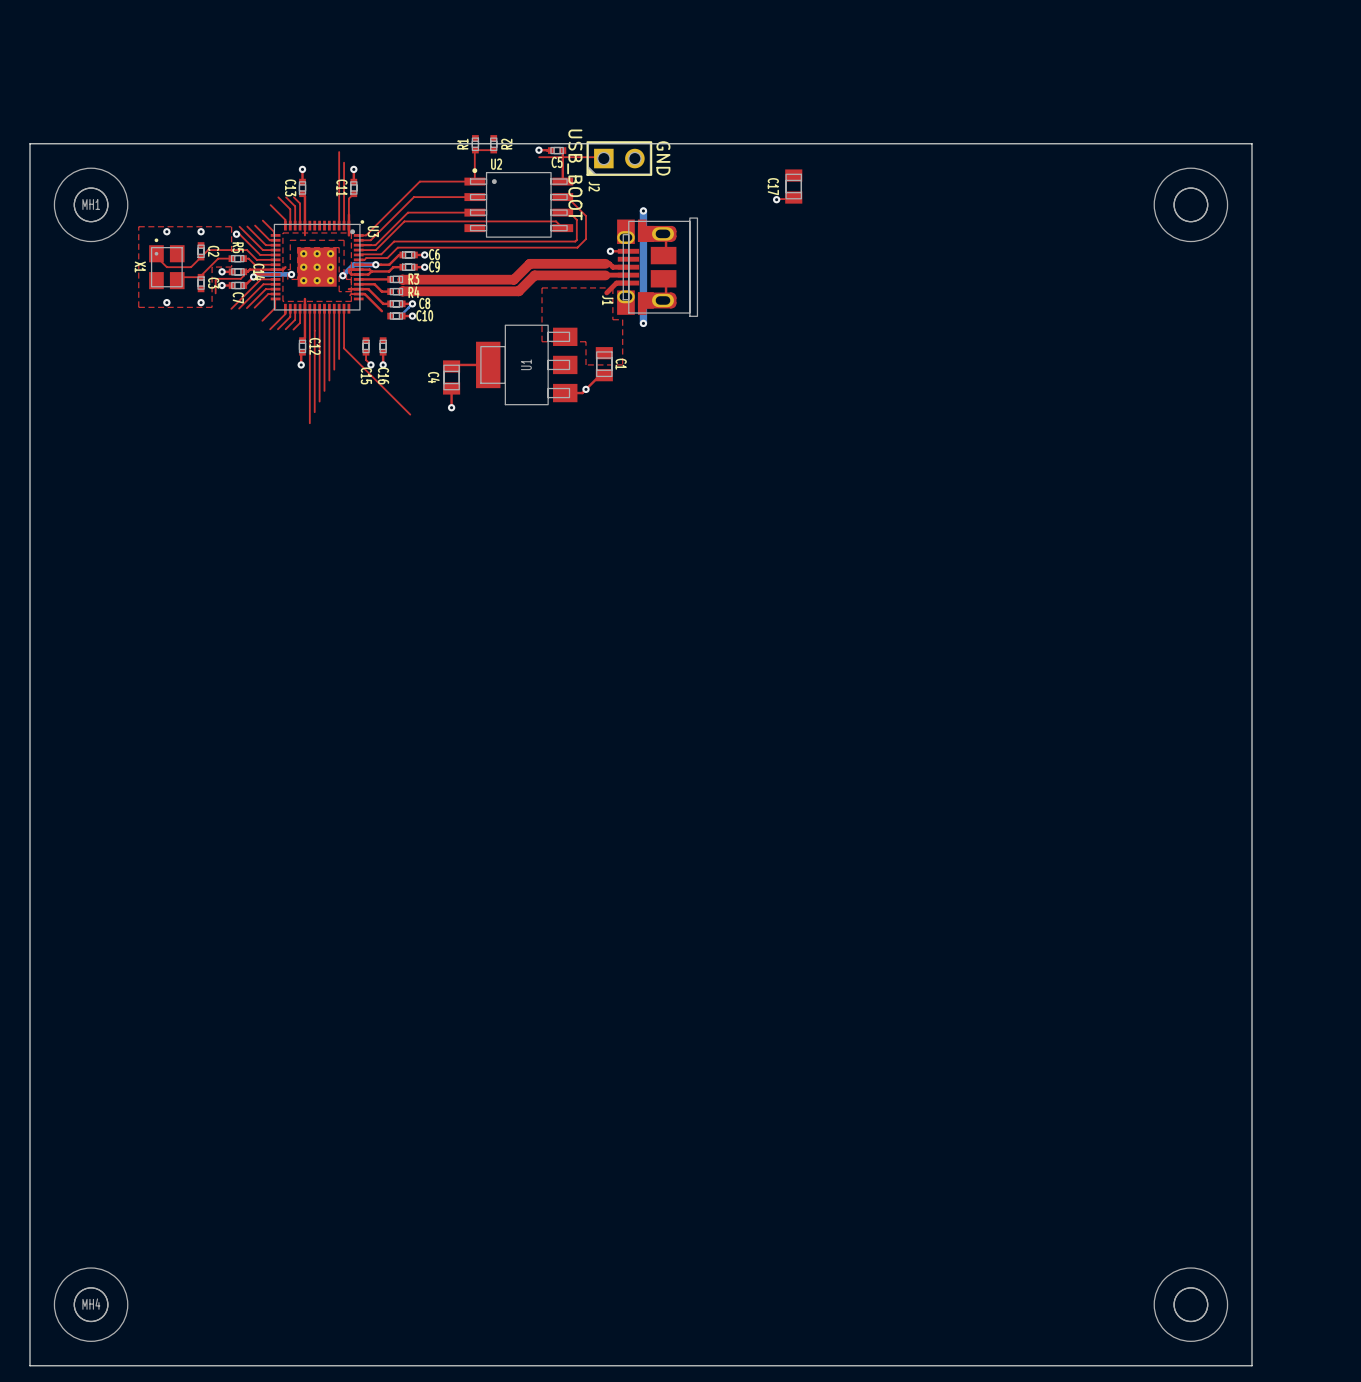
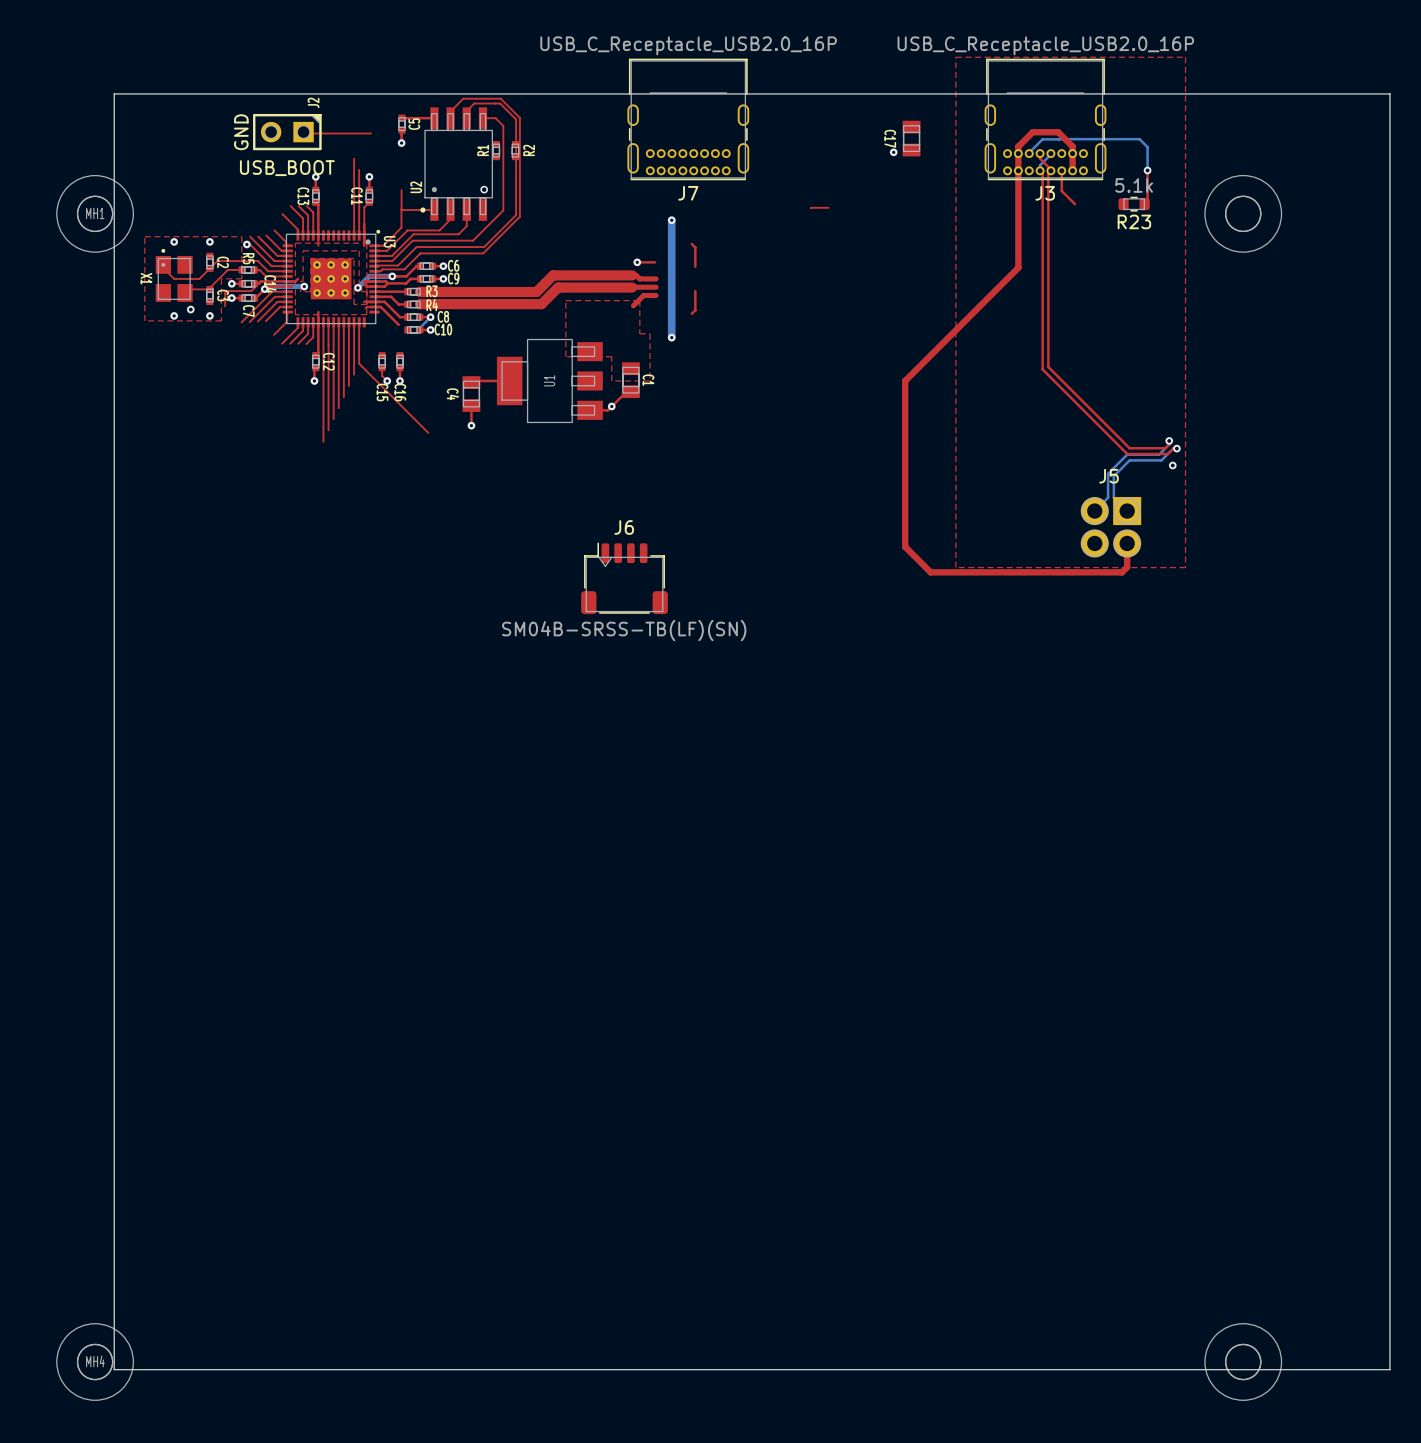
top zone outline: none -> (955, 57) (955, 567) (1185, 567) (1185, 57) (955, 57)
top track: none -> (401, 117) (434, 118)
J7: none -> USB_C_Receptacle_USB2.0_16P (688, 119)
J3: none -> USB_C_Receptacle_USB2.0_16P (1045, 119)
top track: none -> (401, 130) (401, 143)
text: none -> GND (241, 132)
top track: none -> (303, 132) (371, 133)
via: none -> (401, 143)
board edge: (29, 143) (1252, 143) (1252, 1365) (29, 1365) (29, 143) -> (114, 93) (1389, 93) (1389, 1369) (114, 1369) (114, 93)
via: none -> (893, 152)
bottom track: none -> (1029, 153) (1042, 139) (1139, 139) (1147, 147) (1147, 170)
top track: none -> (1040, 153) (1040, 158) (1050, 169) (1048, 173) (1048, 367) (1129, 448) (1165, 448) (1169, 444) (1169, 440)
bottom track: none -> (1050, 153) (1040, 165) (1040, 170)
top track: (493, 150) (474, 150) (474, 181) (419, 181) (366, 235) -> (401, 209) (401, 227) (382, 245)
top track: (538, 150) (551, 150) -> none
via: (538, 150) -> none
C5 rotation: 0° (557, 150) -> 90° clockwise (401, 124)
C5 position: (557, 150) -> (401, 124)
top track: (563, 150) (562, 181) -> none
top track: (539, 157) (603, 158) -> none
J2 rotation: 0° (619, 158) -> 180° (287, 132)
J2 position: (619, 158) -> (287, 132)
text: GND (663, 158) -> none
top track: none -> (1040, 170) (1042, 173) (1042, 369) (1127, 454) (1167, 454) (1173, 448) (1176, 448)
top track: none -> (1061, 170) (1061, 190) (1074, 204)
top track: none -> (1072, 170) (1072, 146) (1058, 132) (1032, 132) (1018, 146) (1018, 267) (905, 380) (905, 546) (930, 572) (1122, 572) (1127, 567) (1127, 543)
top track: none -> (1147, 170) (1147, 201) (1144, 204)
via: none -> (1147, 170)
text rotation: 0° (574, 174) -> 90° counterclockwise (287, 168)
text position: USB_BOOT (574, 174) -> USB_BOOT (287, 168)
via: none -> (484, 189)
top track: none -> (401, 190) (402, 210) (434, 210)
C17 position: (793, 186) -> (911, 138)
R23: none -> 5.1k (1134, 204)
top track: (474, 197) (413, 197) (390, 220) -> (450, 210) (450, 219) (439, 230) (407, 230)
top track: (567, 197) (586, 215) (586, 239) (577, 247) (397, 247) -> (450, 111) (463, 98) (500, 98) (519, 117) (519, 216) (483, 253) (420, 253) (415, 258)
via: (776, 199) -> none
U2 rotation: 0° (518, 202) -> 90° counterclockwise (456, 164)
U2 position: (518, 202) -> (456, 164)
top track: (474, 212) (407, 212) (396, 224) -> (466, 210) (466, 226) (458, 234) (413, 234)
top track: (562, 212) (569, 212) (576, 219) (575, 241) (394, 241) -> (466, 118) (466, 111) (474, 103) (500, 103) (516, 119) (516, 215) (484, 247) (416, 247) (411, 252)
top track: (563, 228) (556, 221) (404, 221) (395, 230) -> (482, 118) (495, 118) (503, 125) (503, 210) (473, 240) (412, 240)
J1: (657, 267) -> none
via: none -> (190, 309)
bottom track: none -> (1169, 440) (1169, 444) (1159, 454) (1127, 454) (1108, 473) (1108, 497) (1094, 511)
via: none -> (1169, 440)
bottom track: none -> (1176, 448) (1173, 448) (1161, 460) (1129, 460) (1113, 476) (1113, 497) (1127, 511)
via: none -> (1176, 448)
via: none -> (1172, 465)
J5: none -> (1110, 527)
J6: none -> SM04B-SRSS-TB(LF)(SN) (624, 578)

